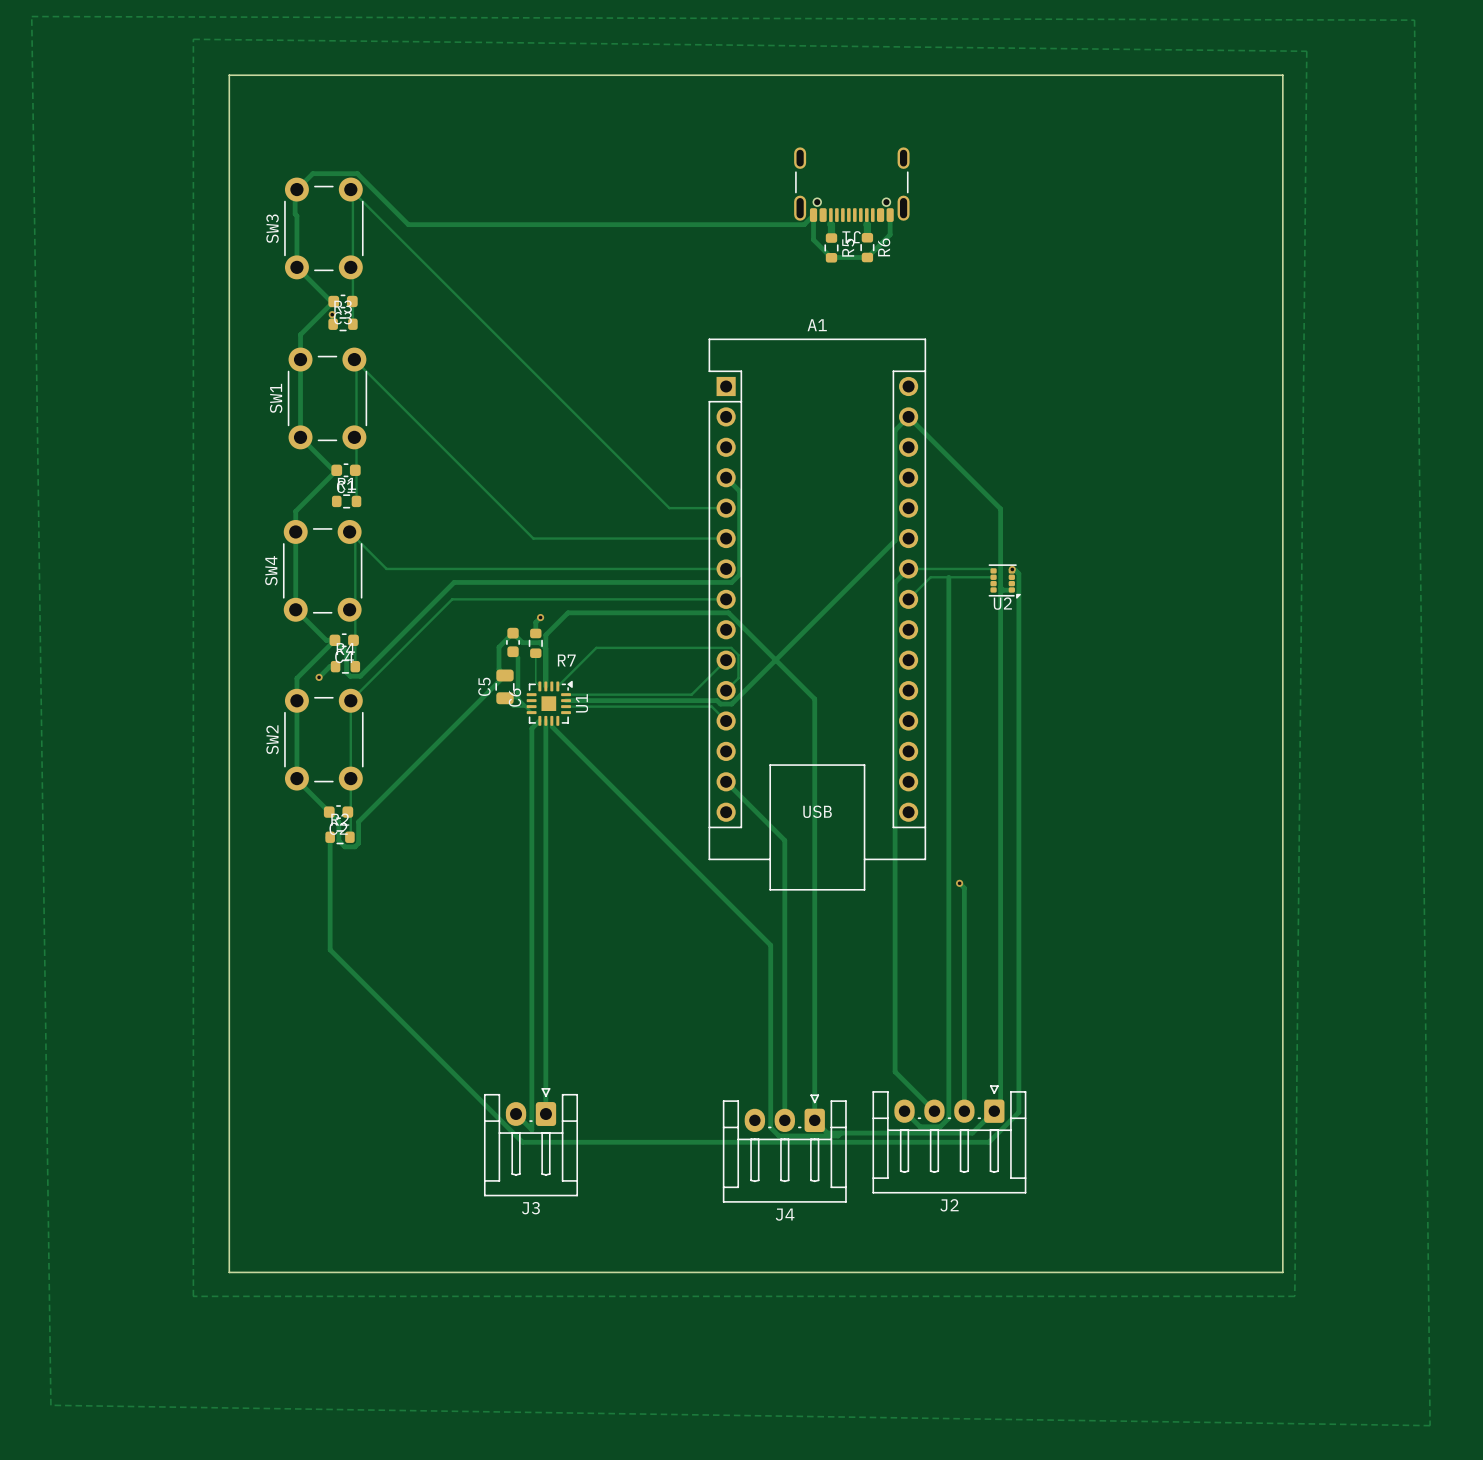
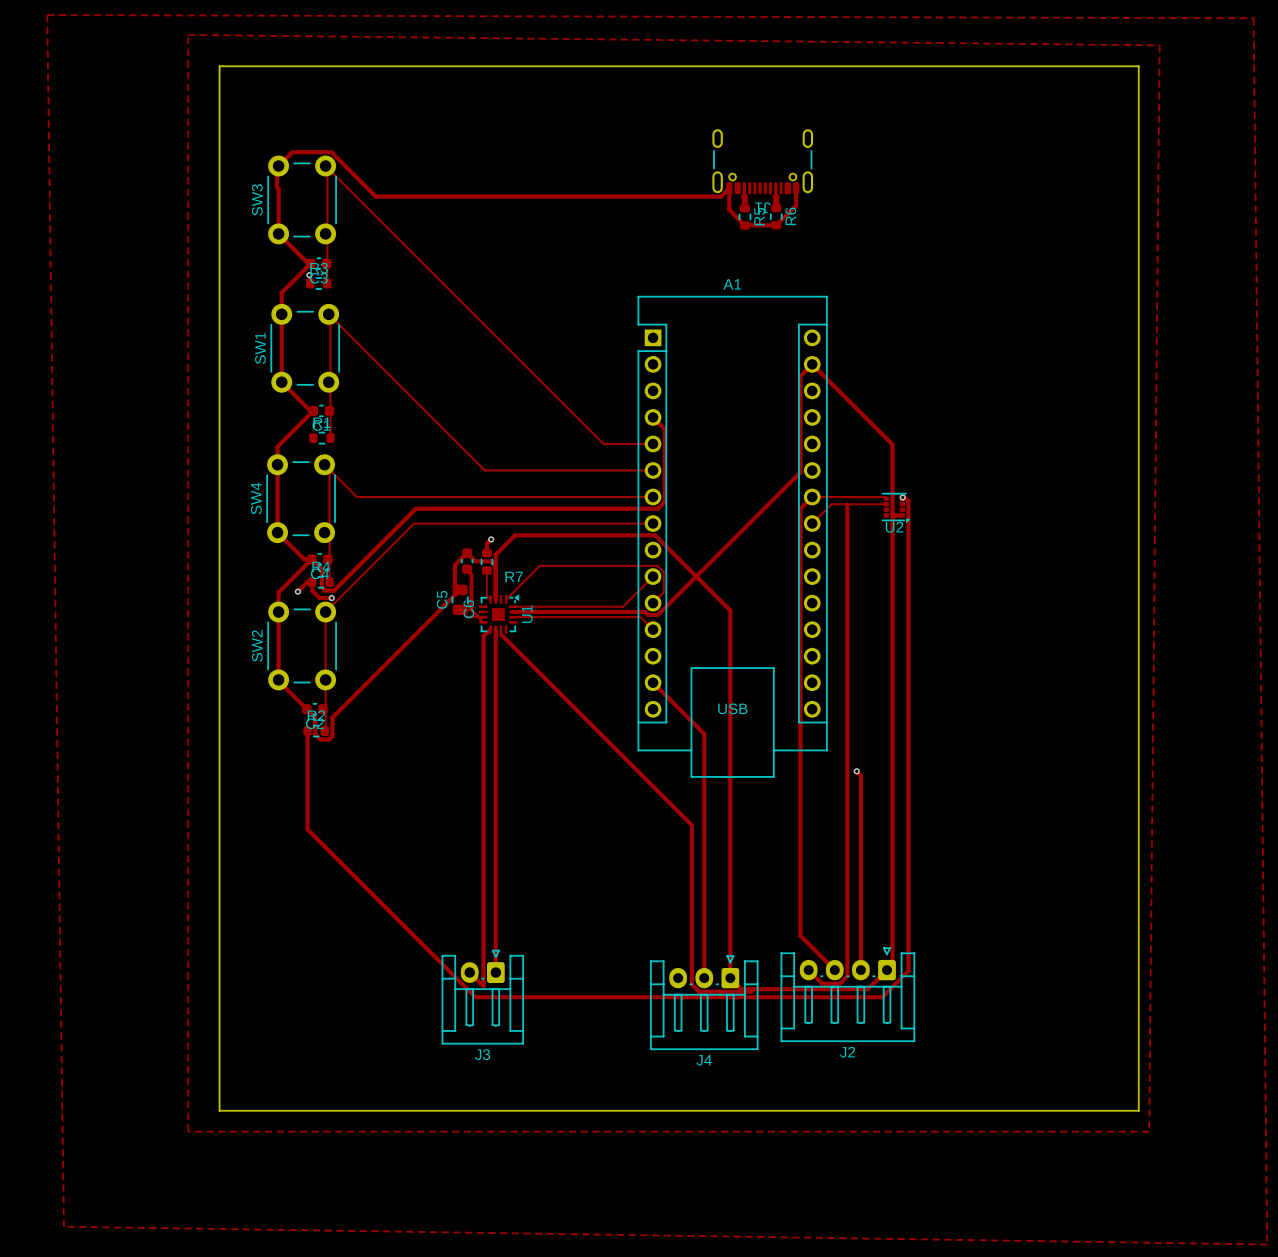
track: none -> (312, 582) (312, 590) (319, 598) (331, 598)
via: none -> (331, 598)

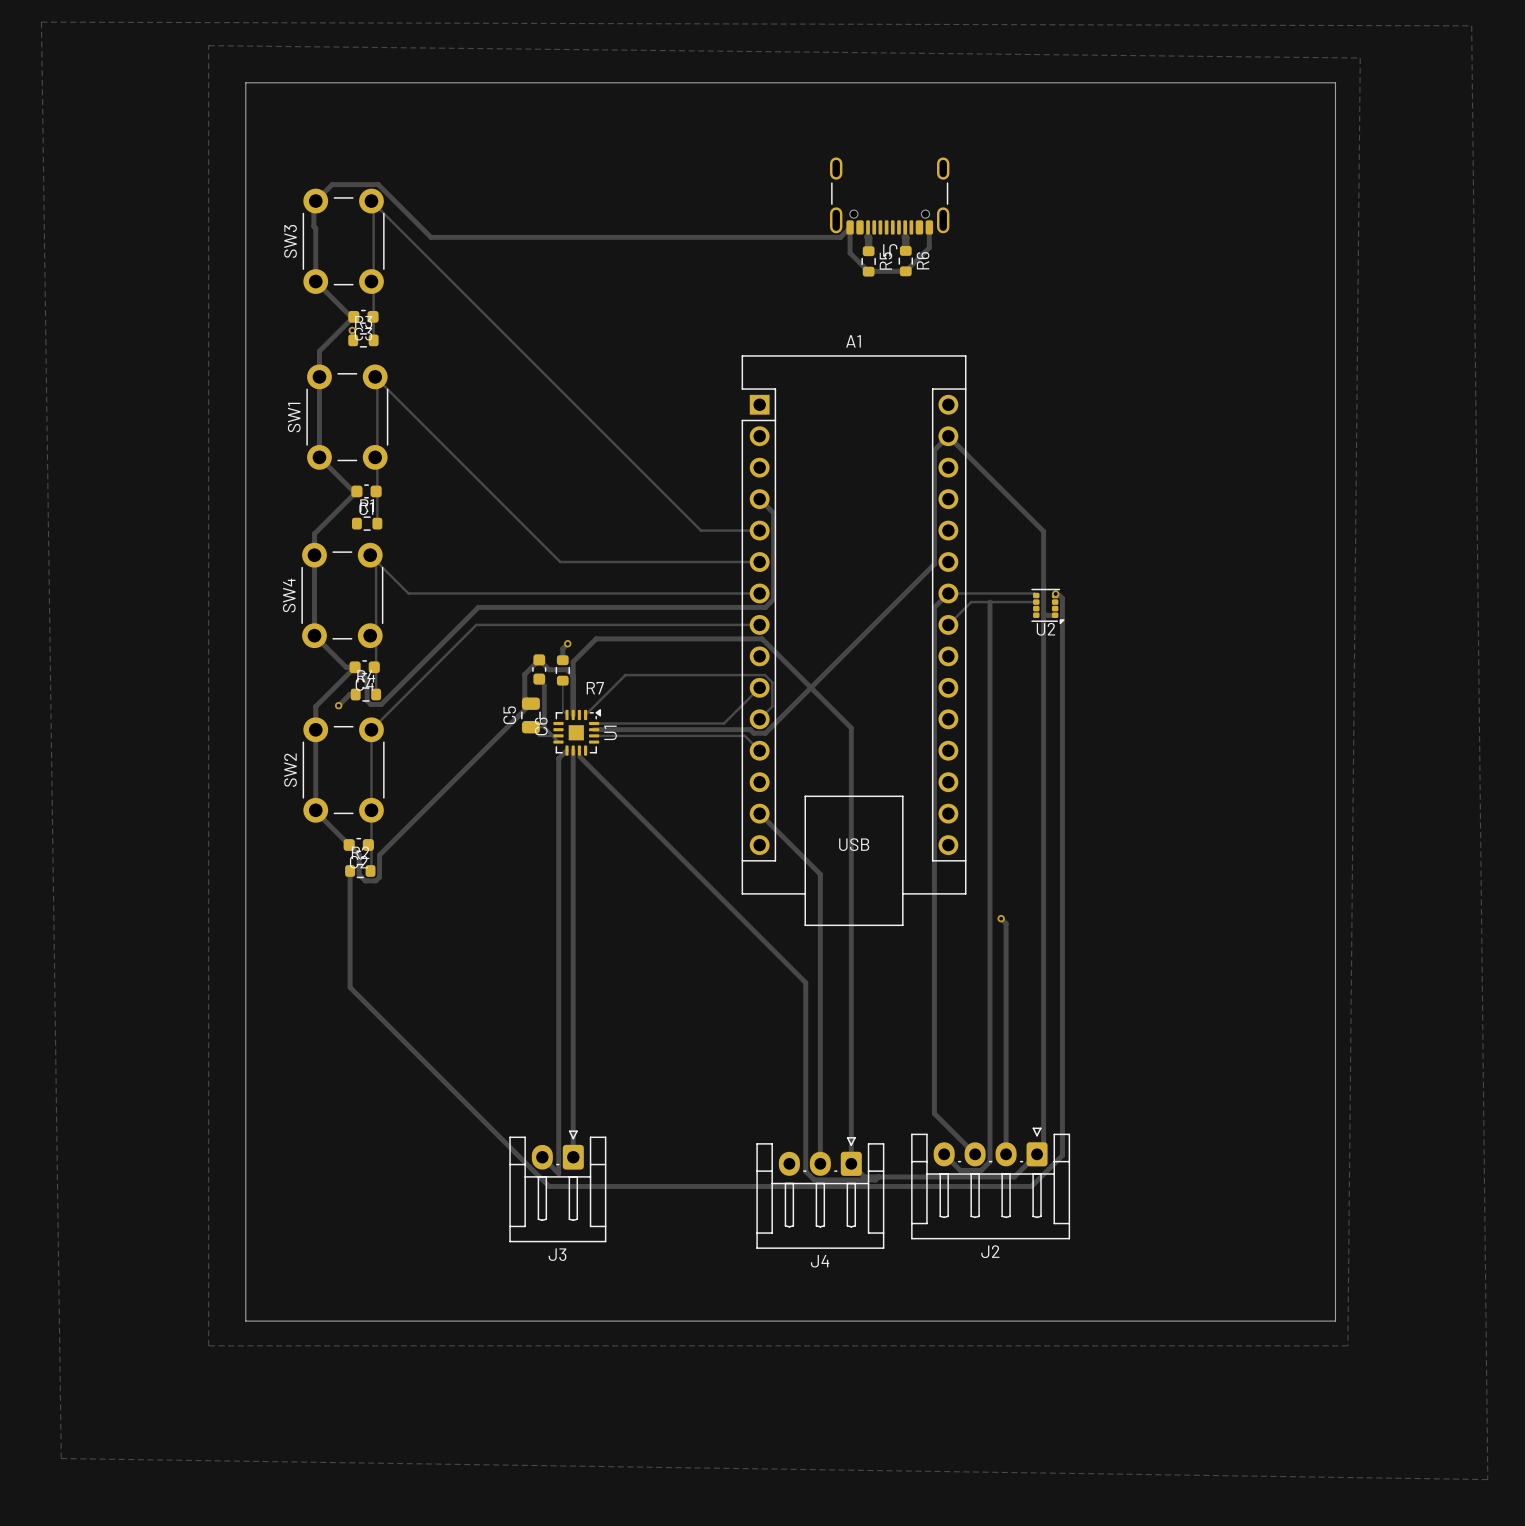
track: (312, 582) (312, 590) (319, 598) (331, 598) -> none
via: (331, 598) -> none

